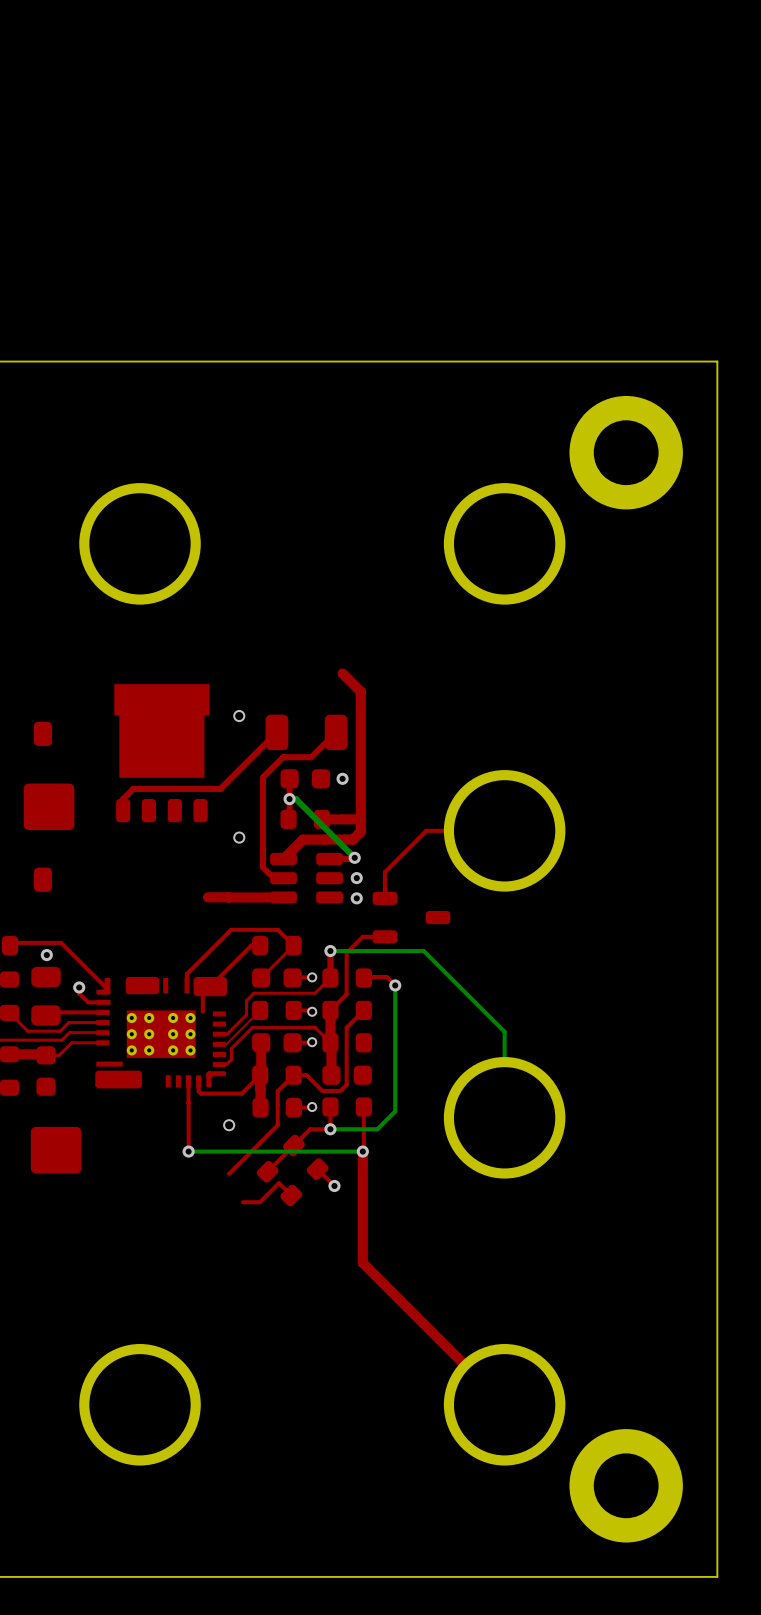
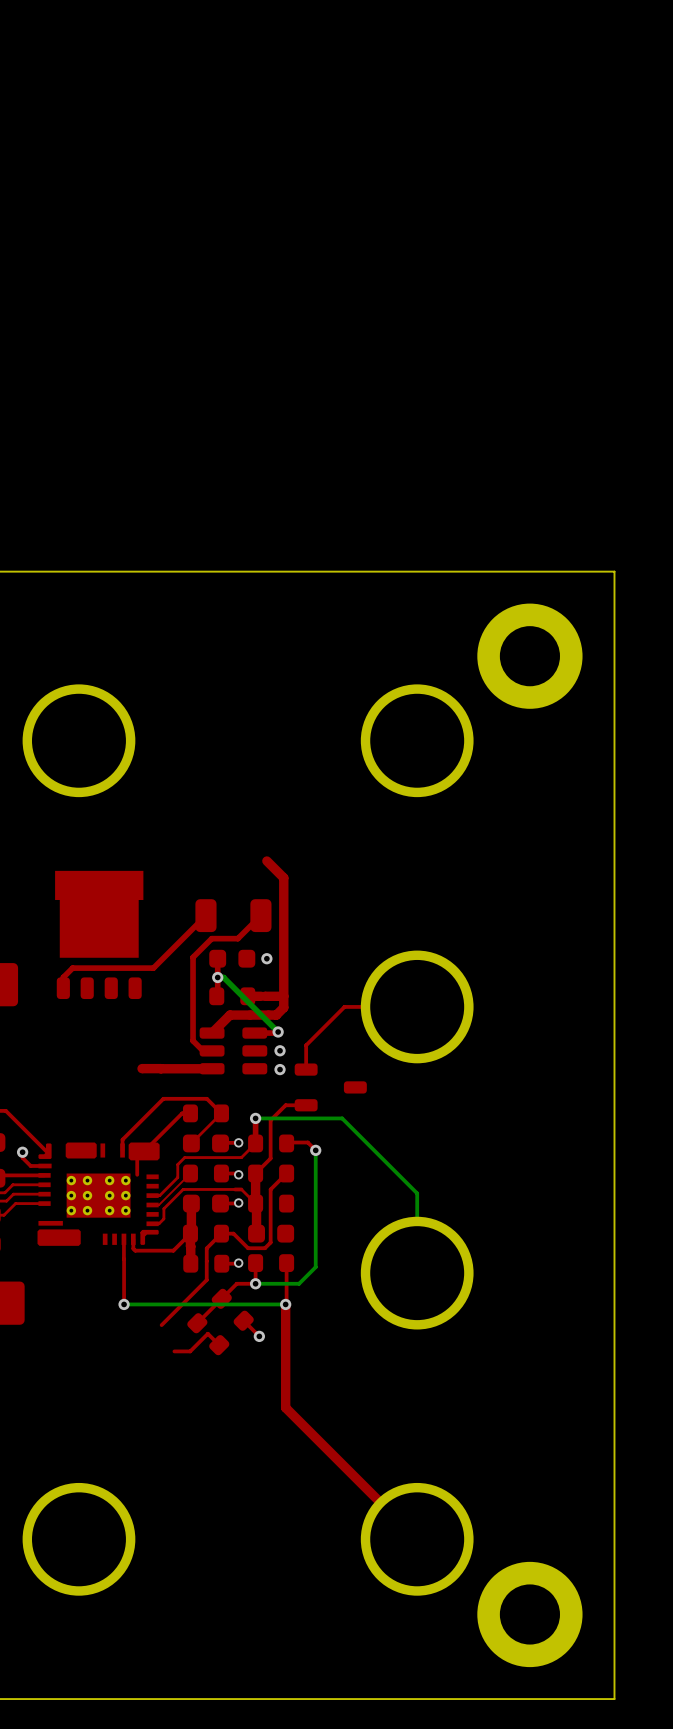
via: (239, 716) -> none
via: (239, 837) -> none
via: (229, 1125) -> none

